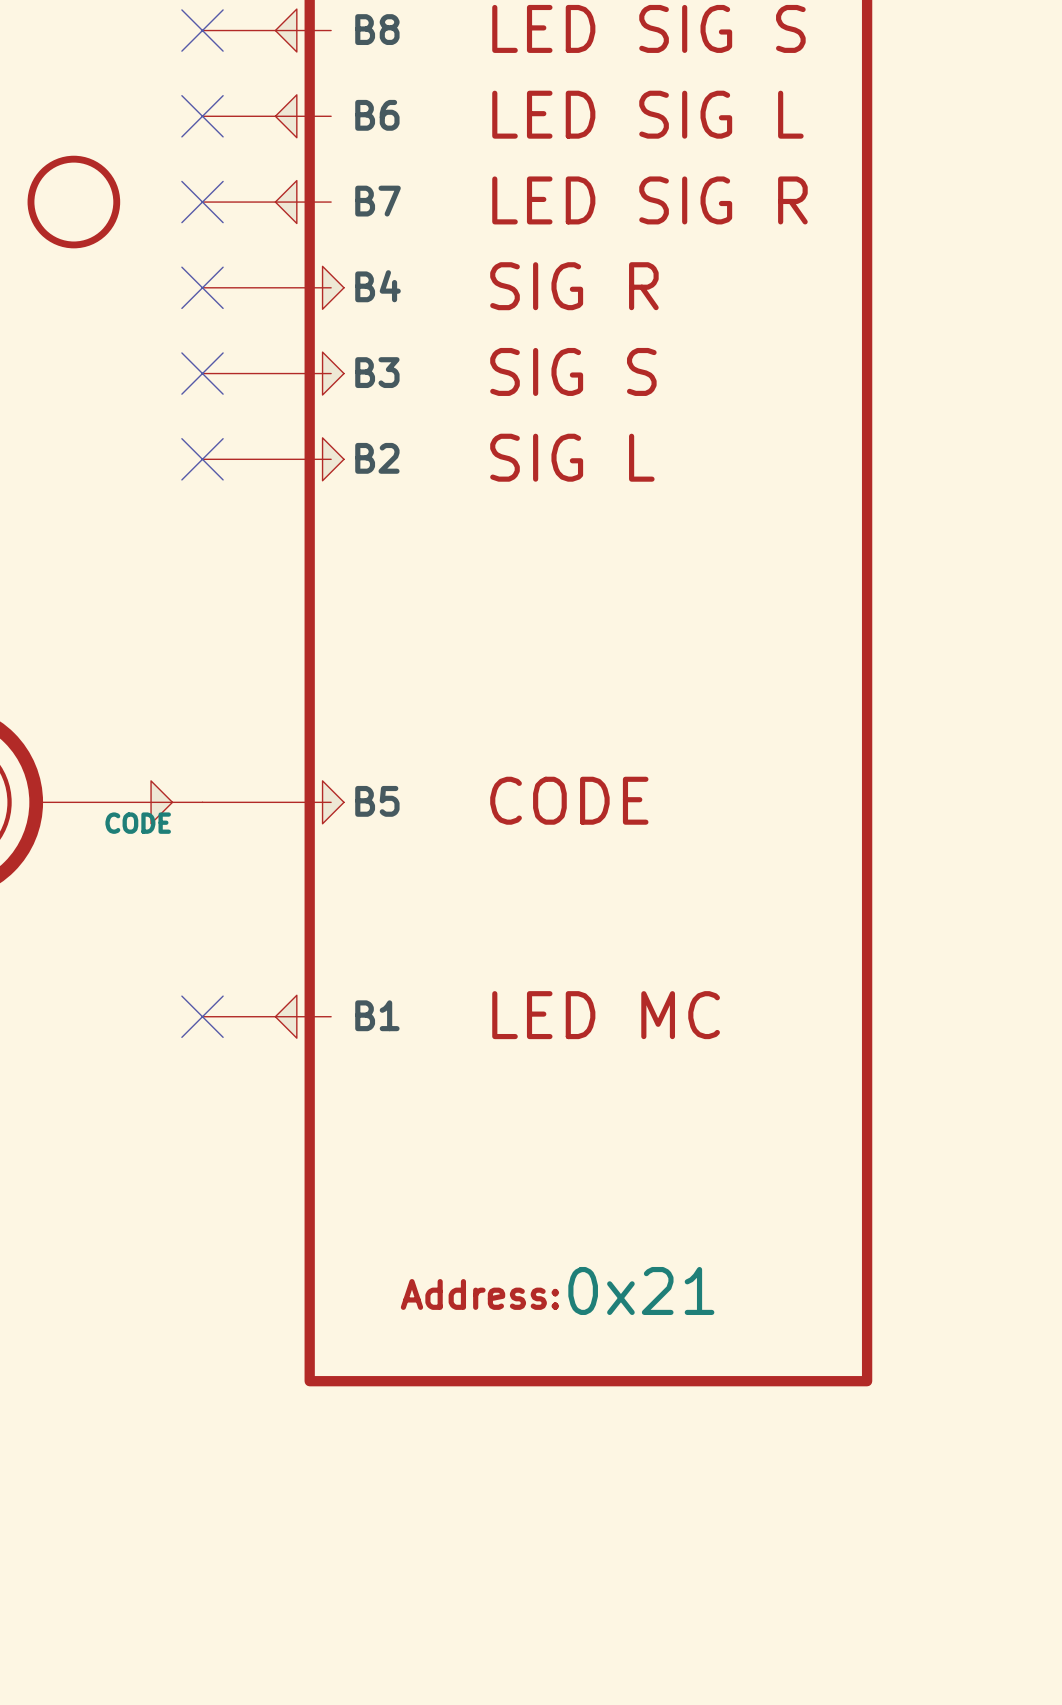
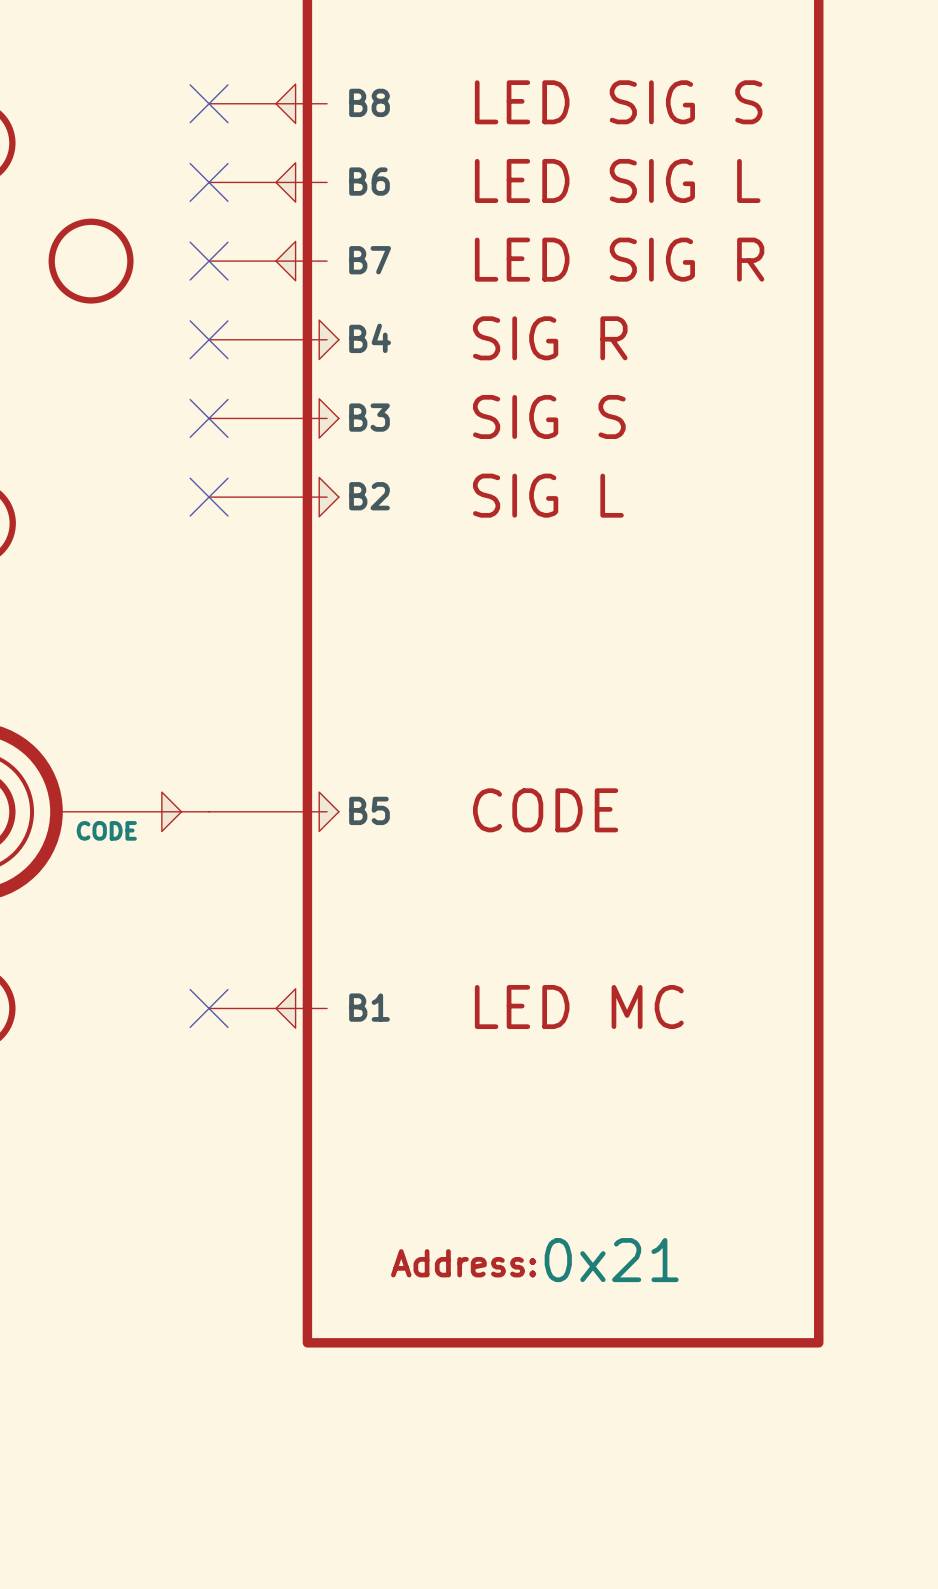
part value position: CODE (138, 823) -> CODE (106, 830)

